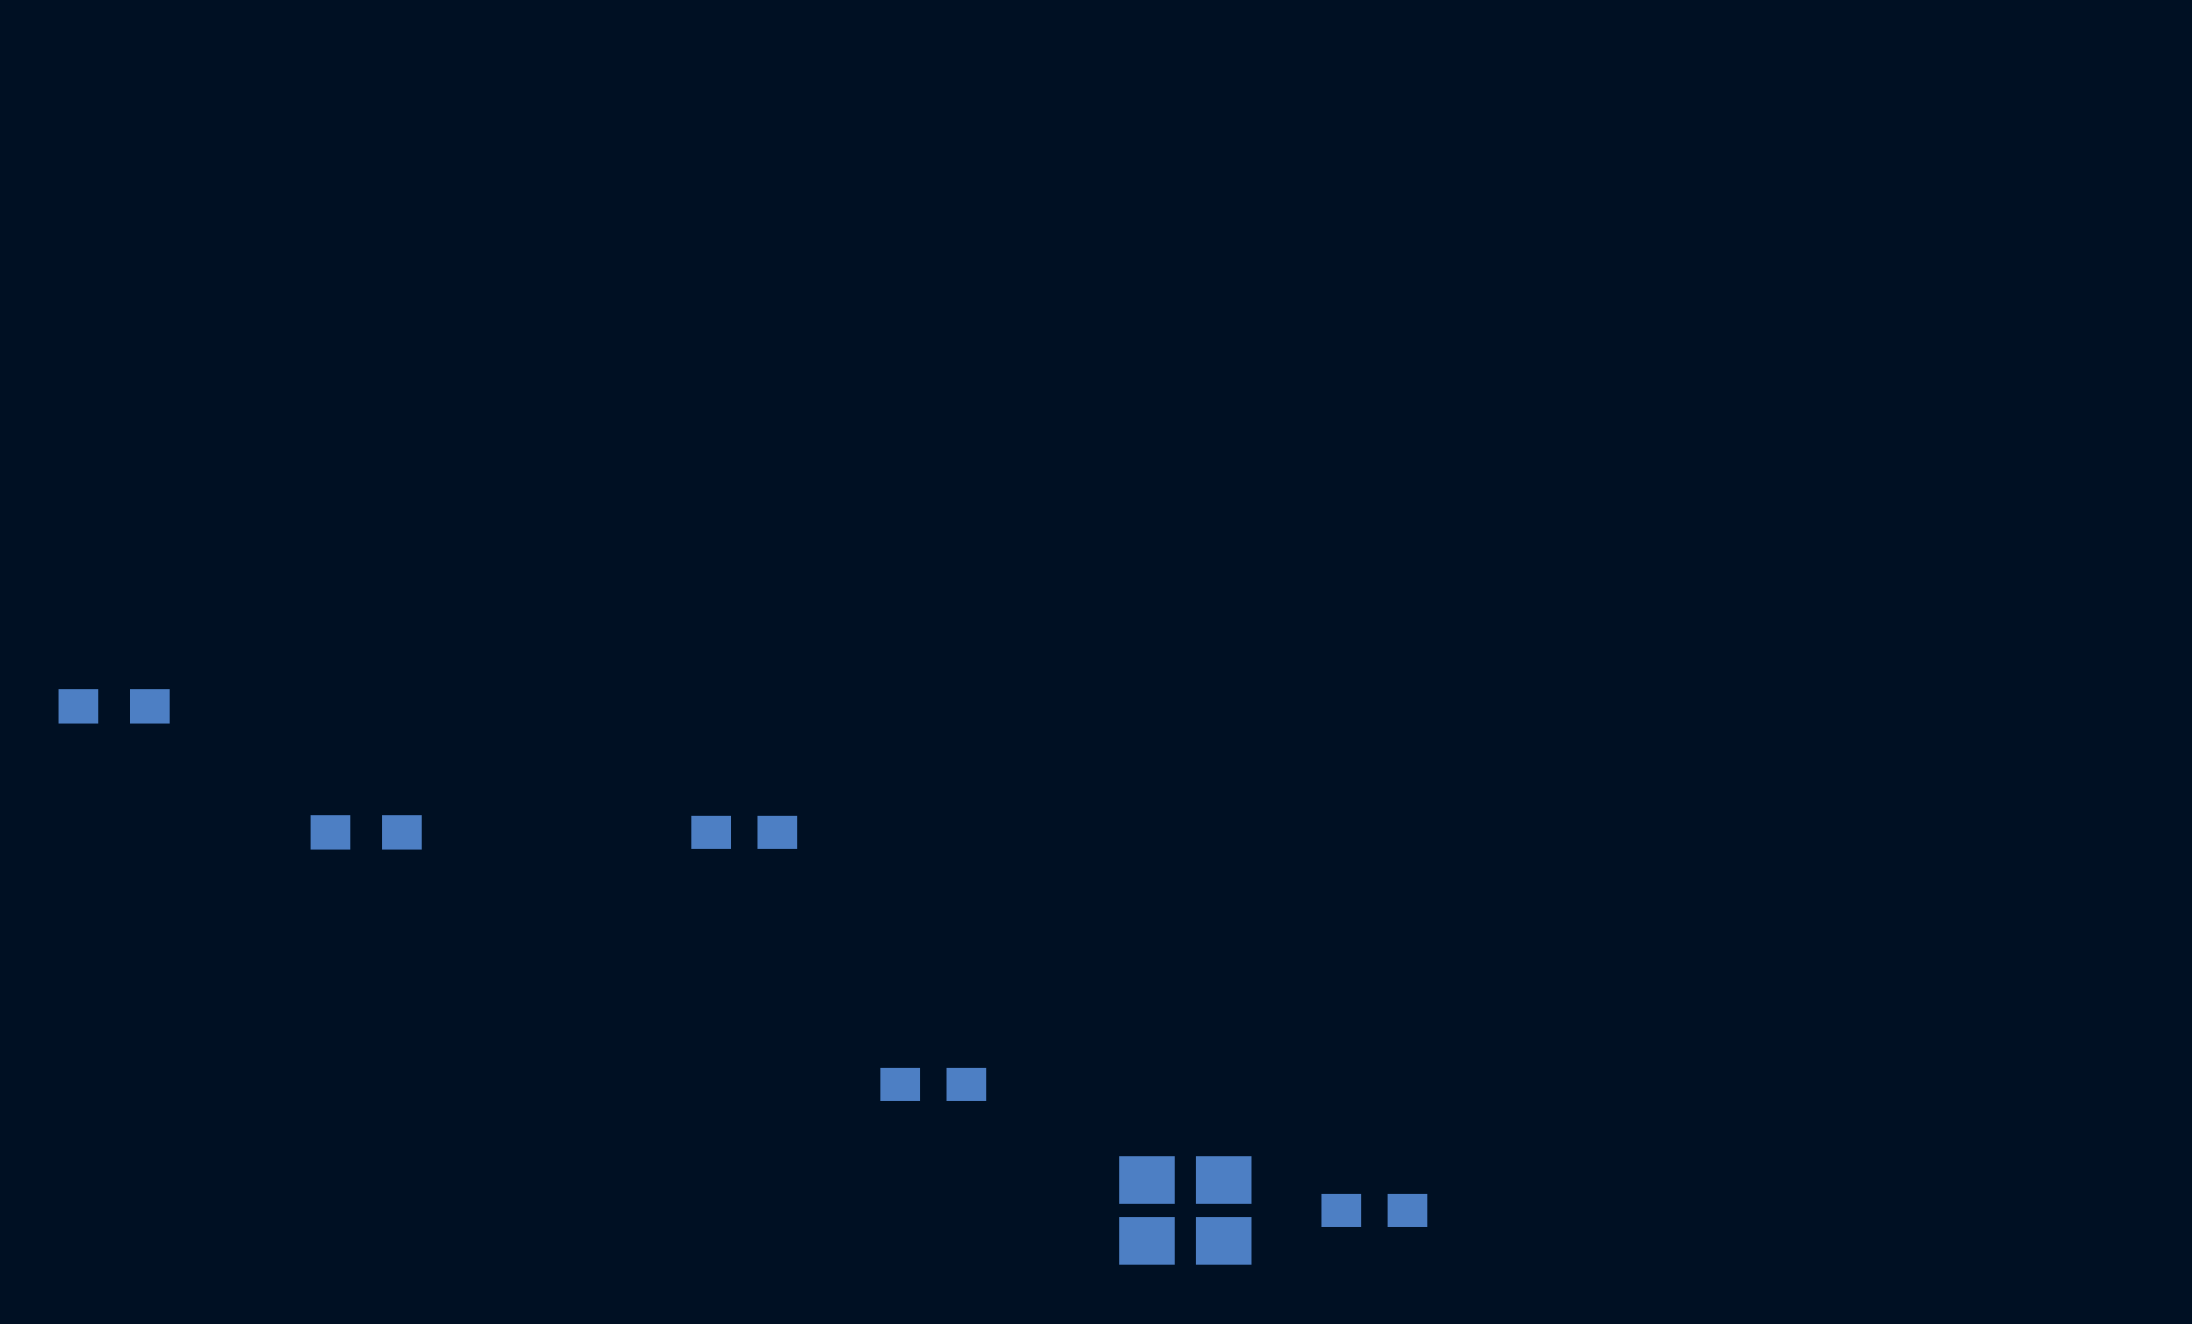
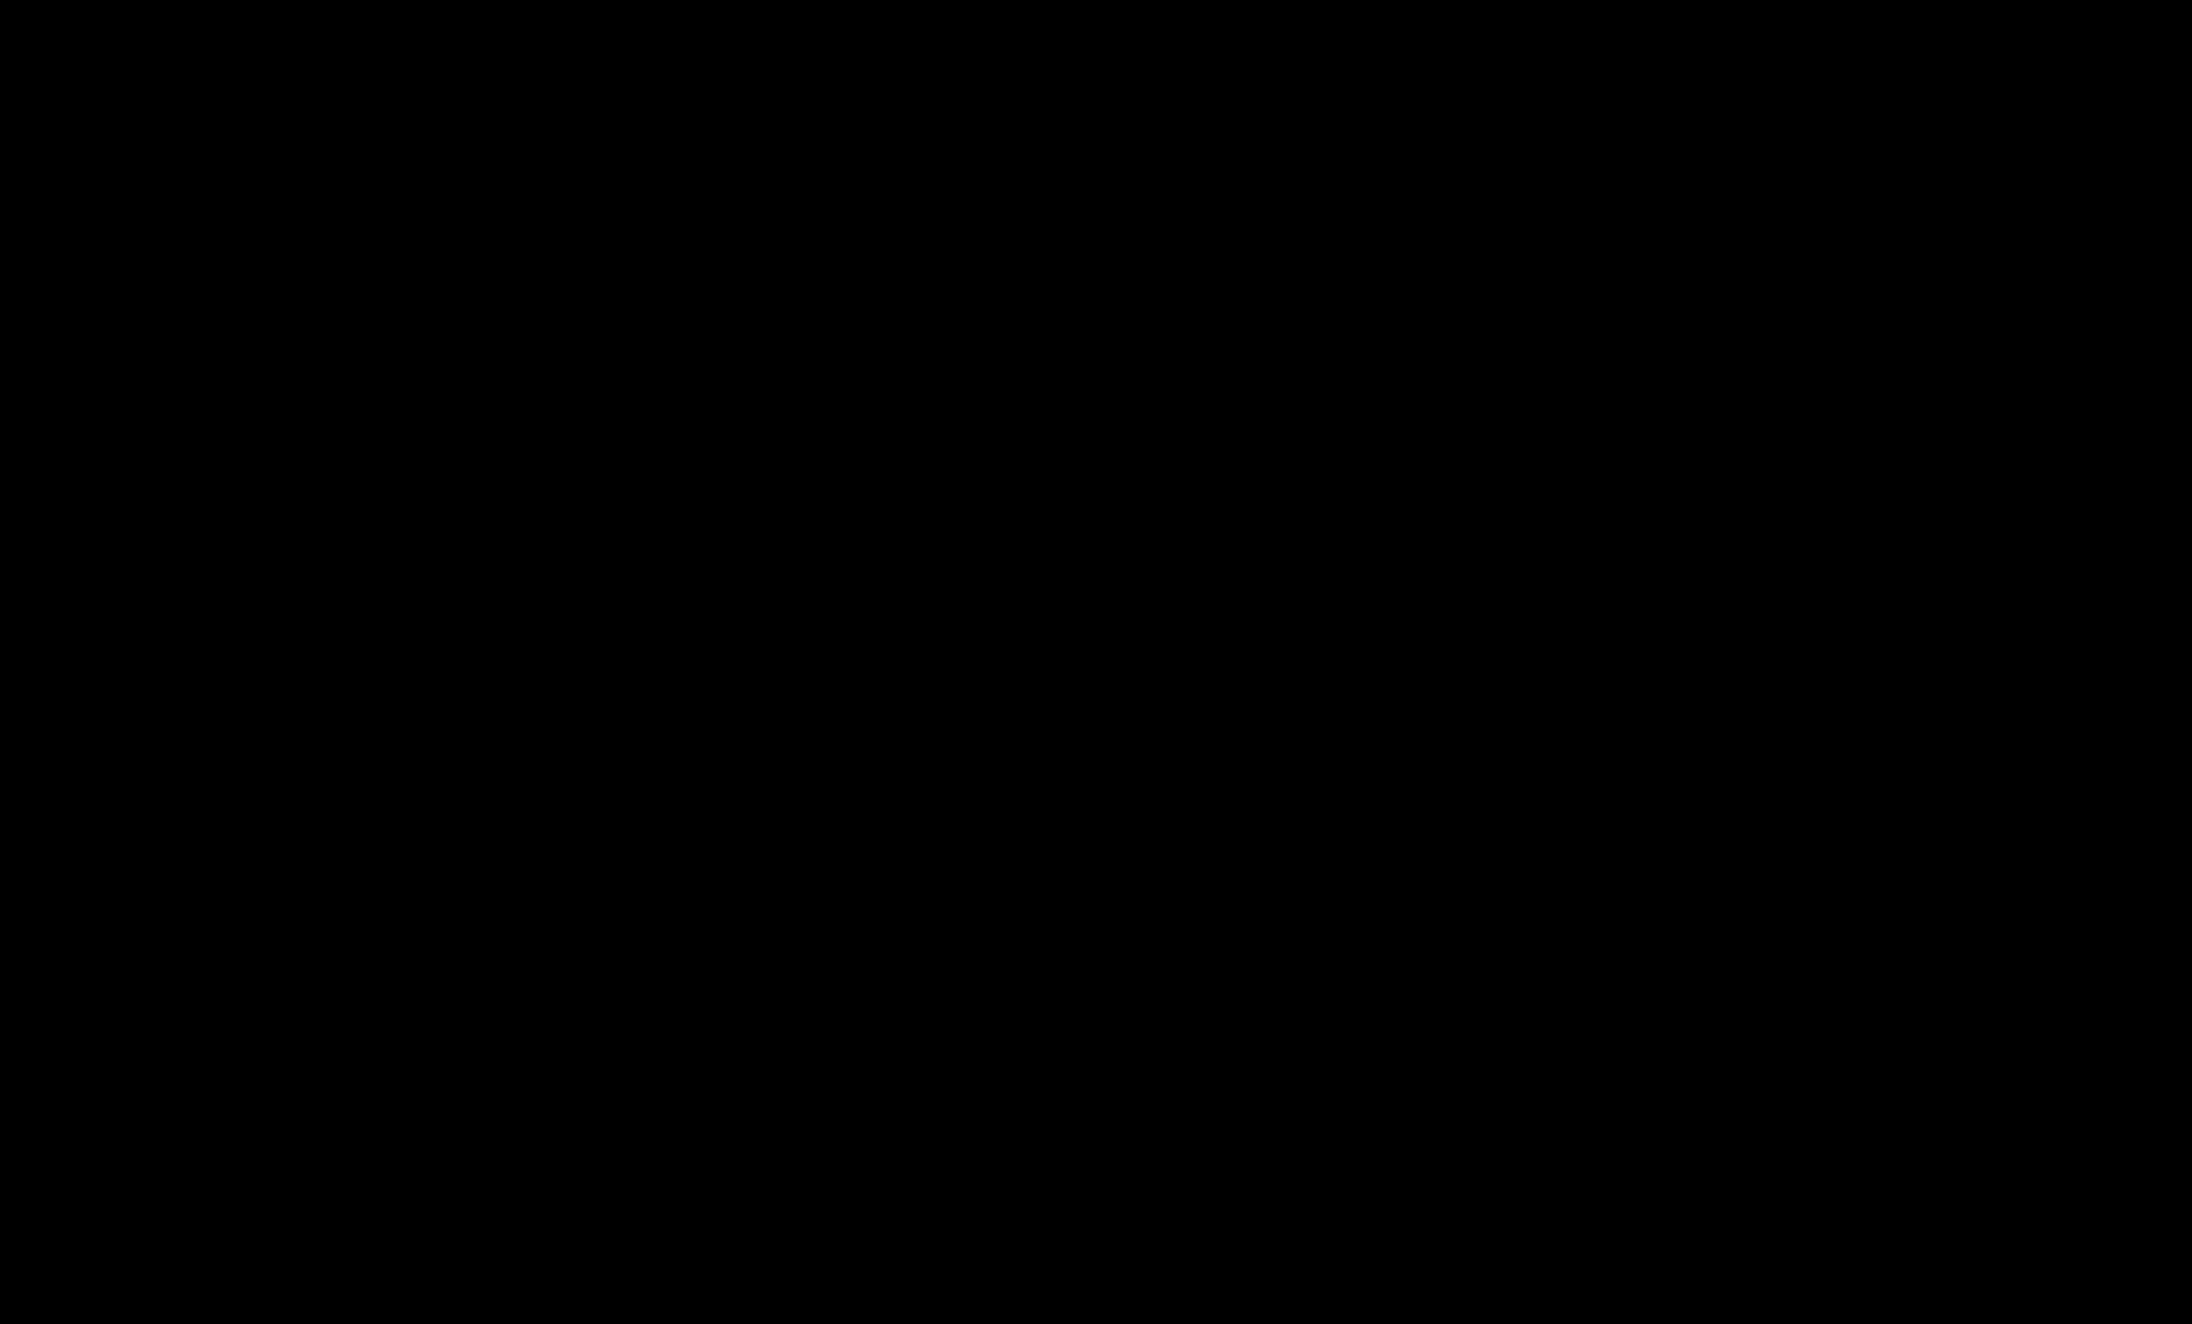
part: (114, 706) -> none
part: (366, 832) -> none
part: (744, 832) -> none
part: (933, 1084) -> none
part: (1185, 1210) -> none
part: (1374, 1210) -> none

